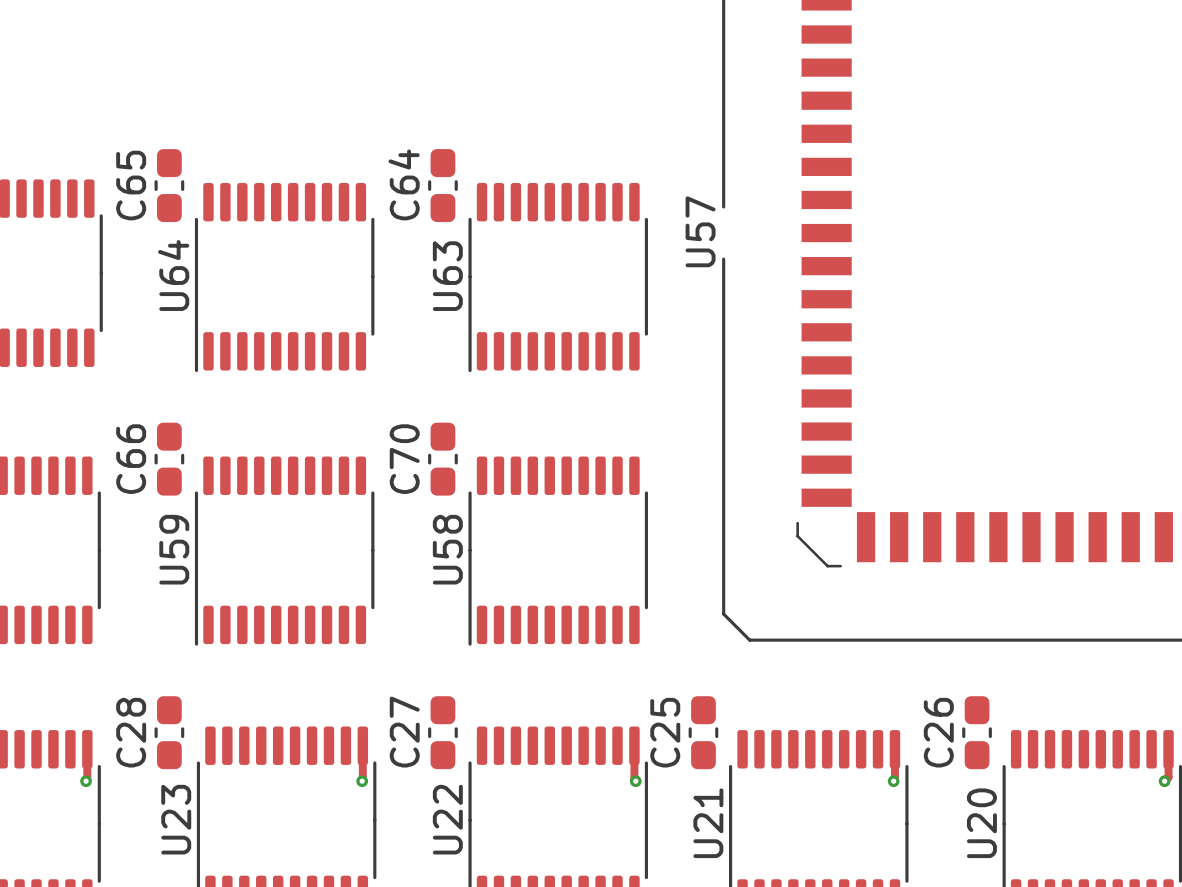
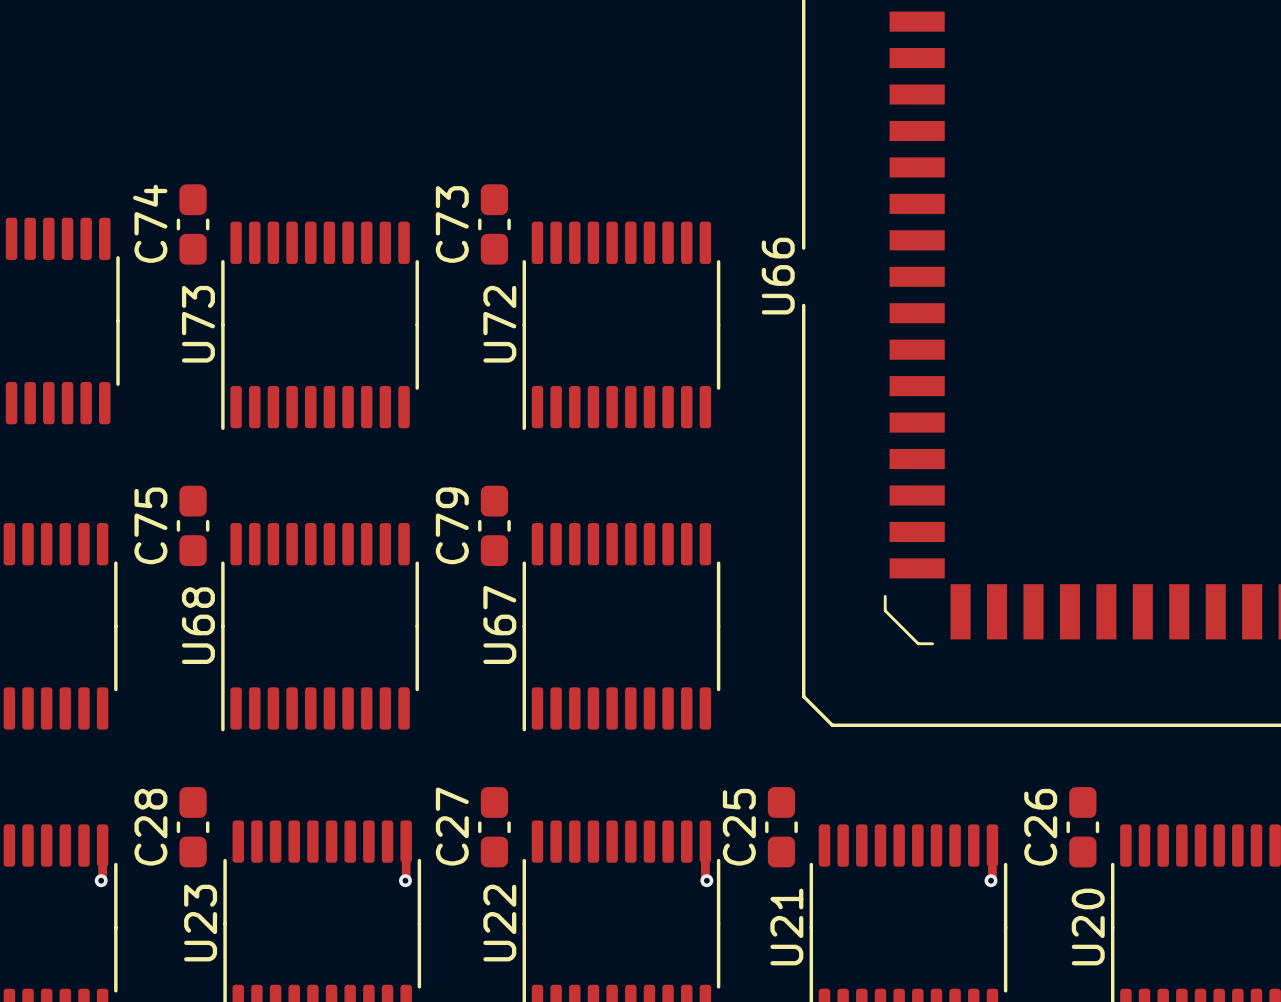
C64 name: C64 (404, 184) -> C73 (452, 224)
C65 name: C65 (131, 185) -> C74 (150, 223)
U57 name: U57 (700, 231) -> U66 (778, 276)
U64 name: U64 (173, 275) -> U73 (198, 324)
U63 name: U63 (447, 276) -> U72 (499, 324)
C66 name: C66 (131, 459) -> C75 (150, 525)
C70 name: C70 (404, 459) -> C79 (452, 525)
U59 name: U59 (174, 549) -> U68 (198, 625)
U58 name: U58 (447, 549) -> U67 (499, 624)

